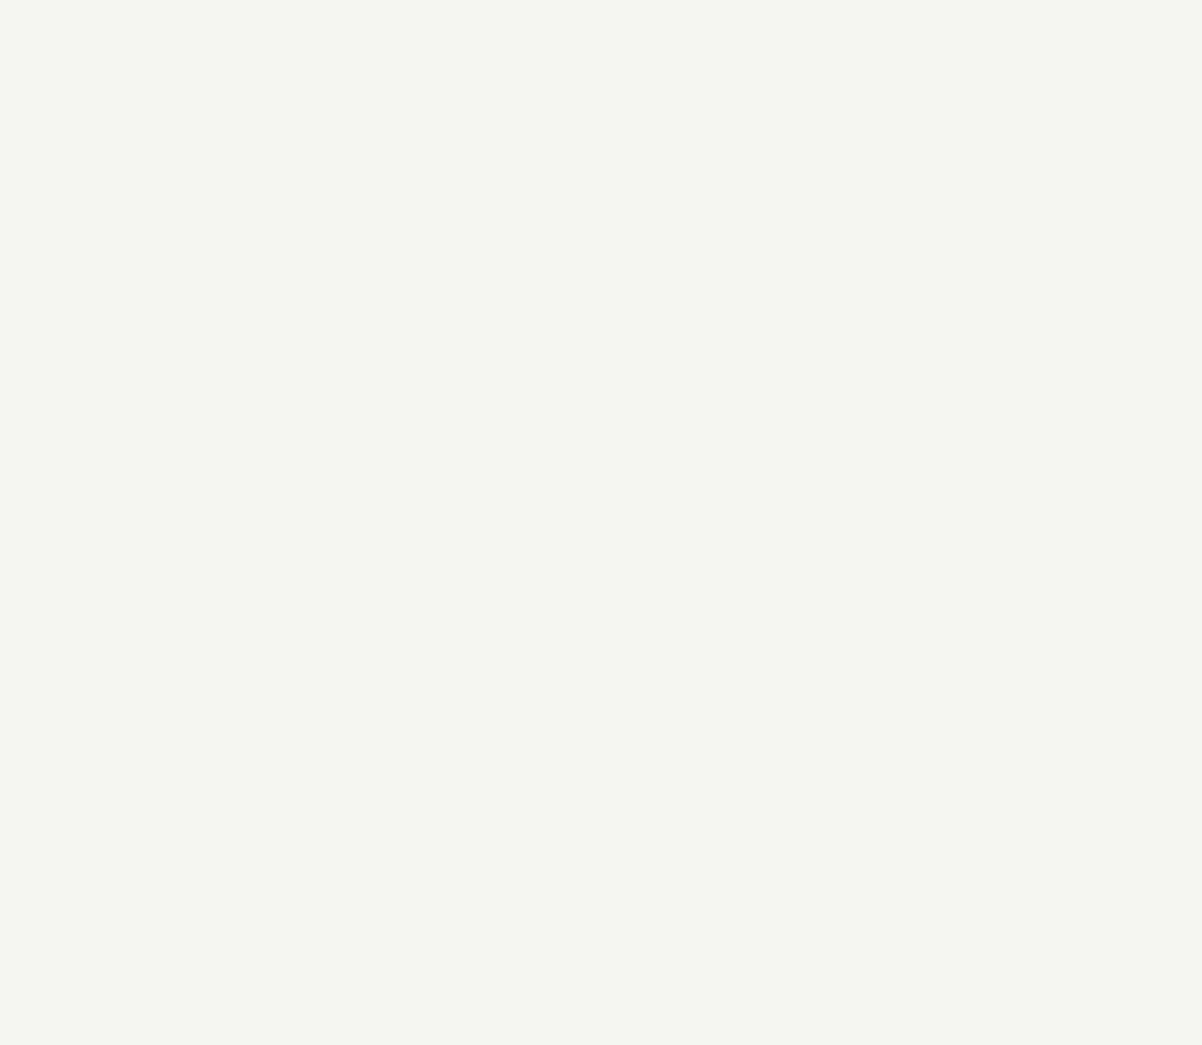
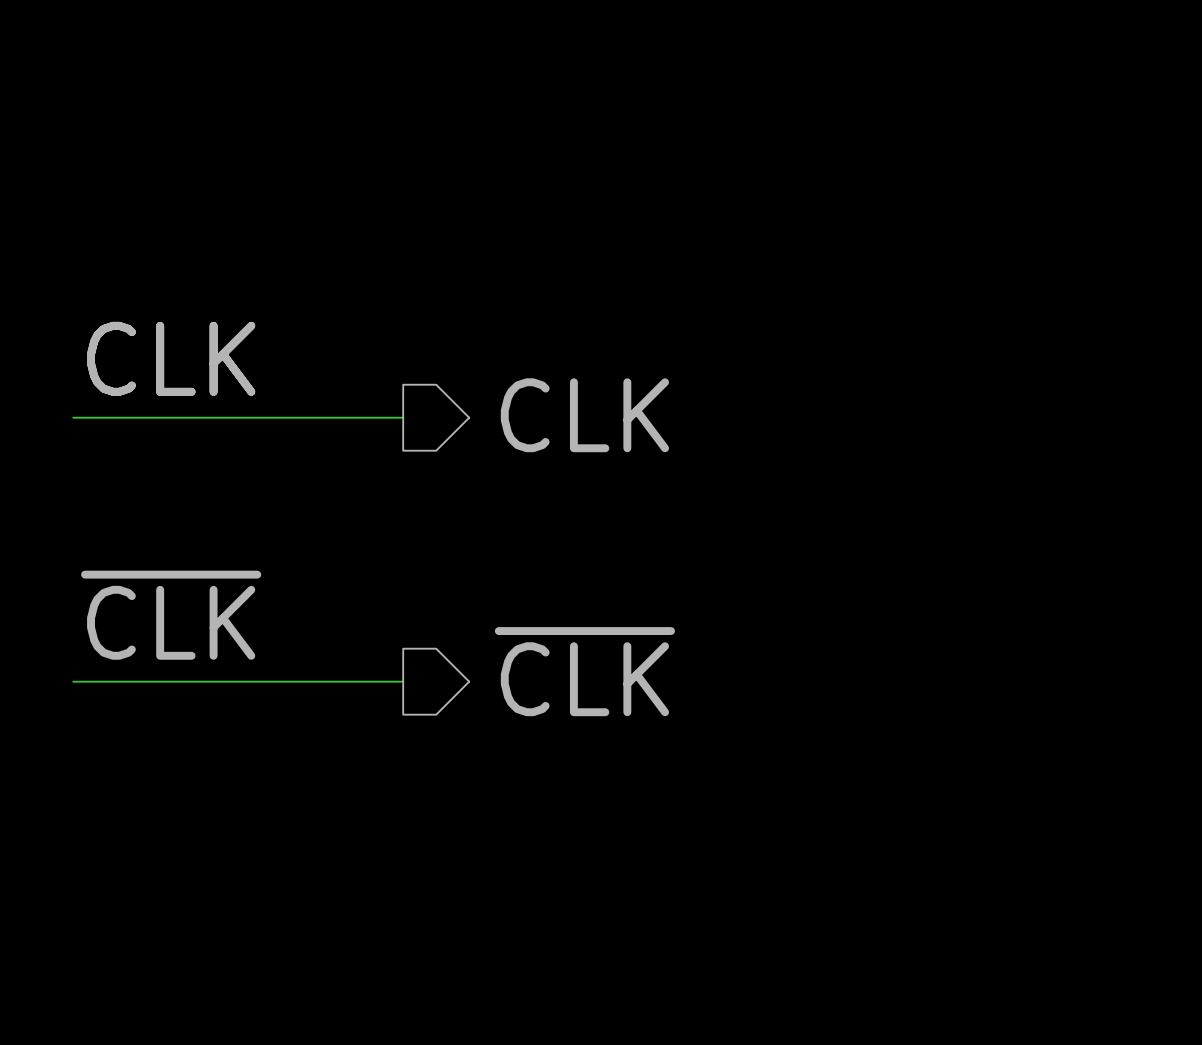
label: none -> CLK (171, 358)
hierarchical label: none -> CLK (584, 415)
wire: none -> (73, 417) (403, 417)
label: none -> ~{CLK} (171, 615)
hierarchical label: none -> ~{CLK} (584, 671)
wire: none -> (73, 681) (403, 681)

